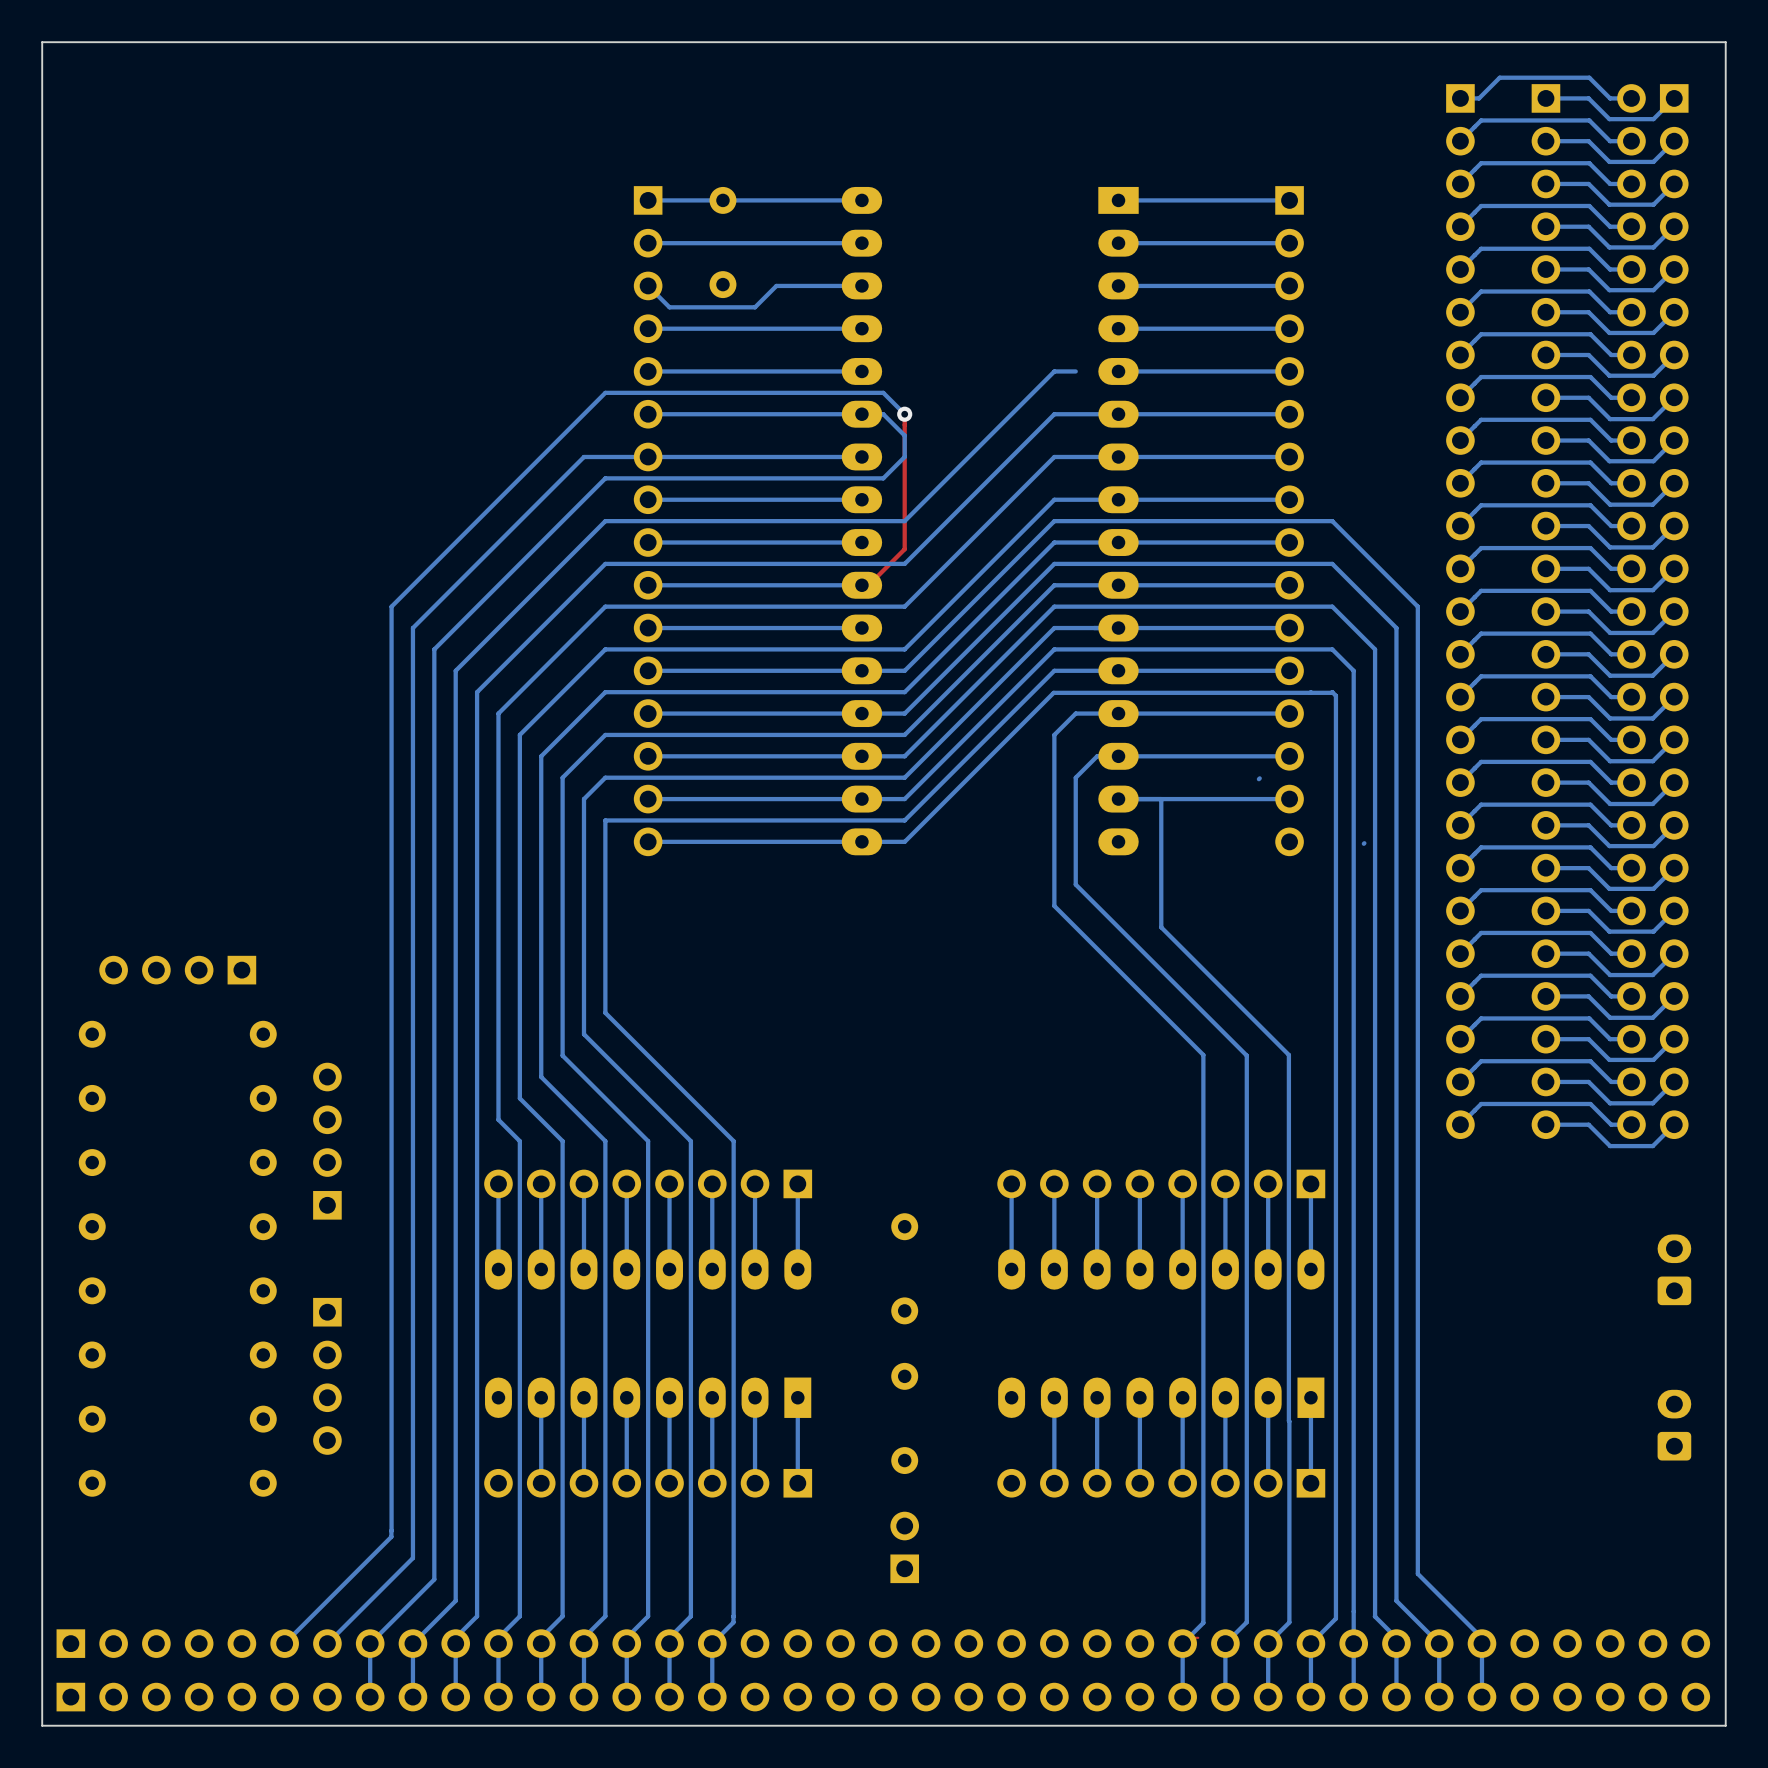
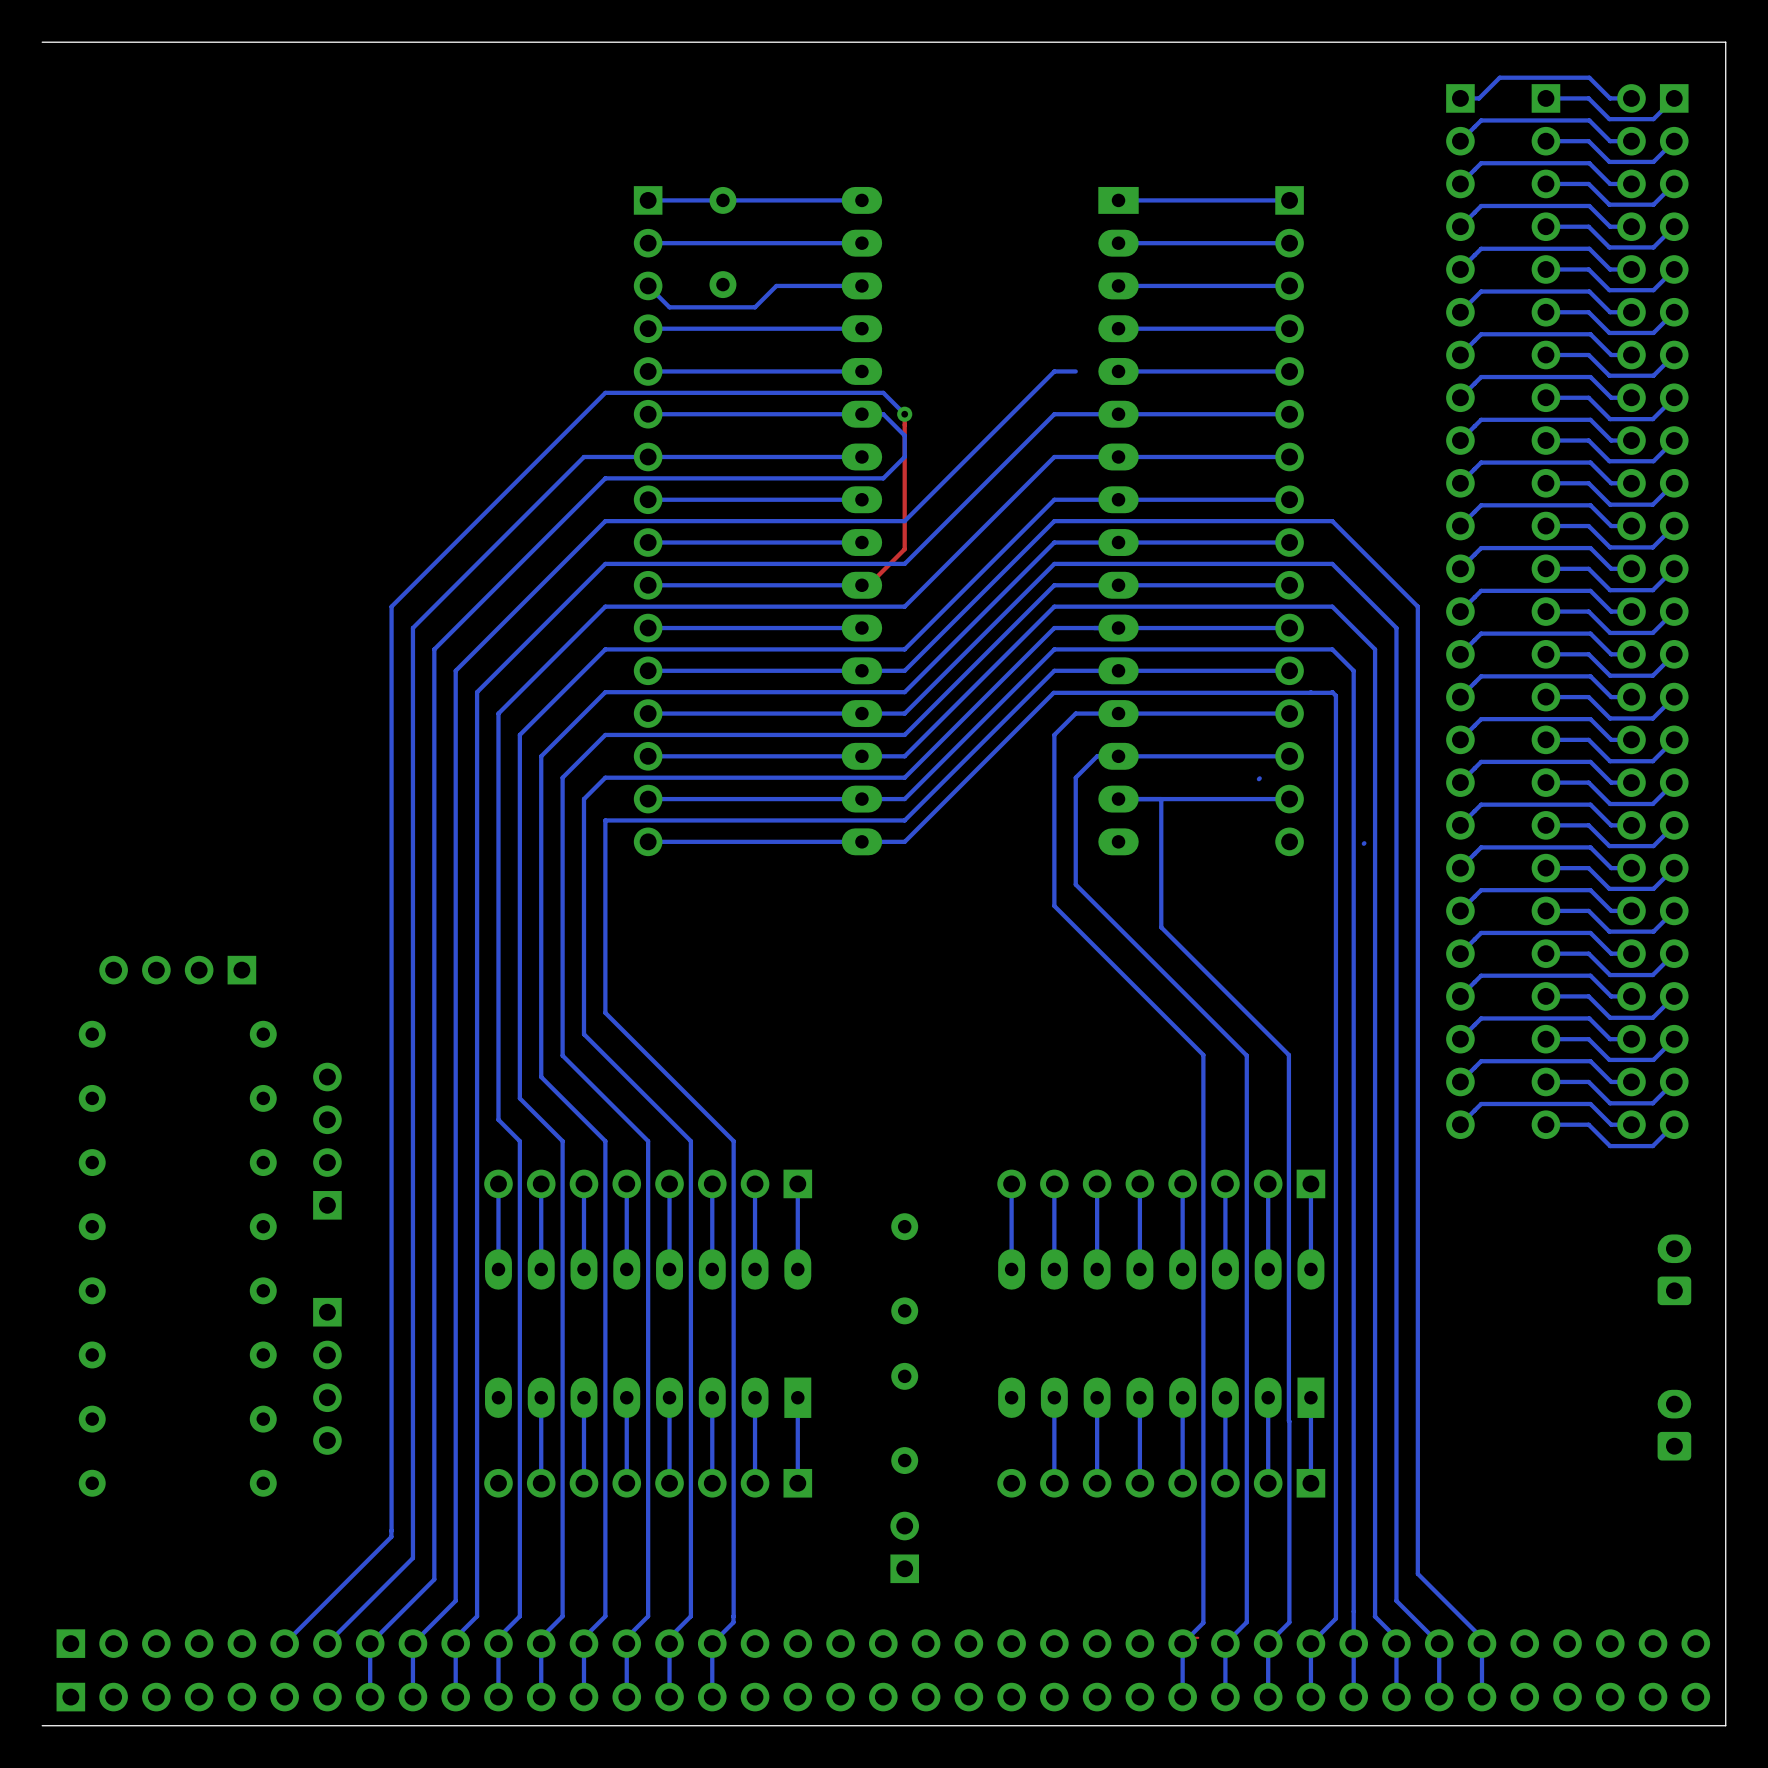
board edge: (42, 42) (42, 1725) -> none

